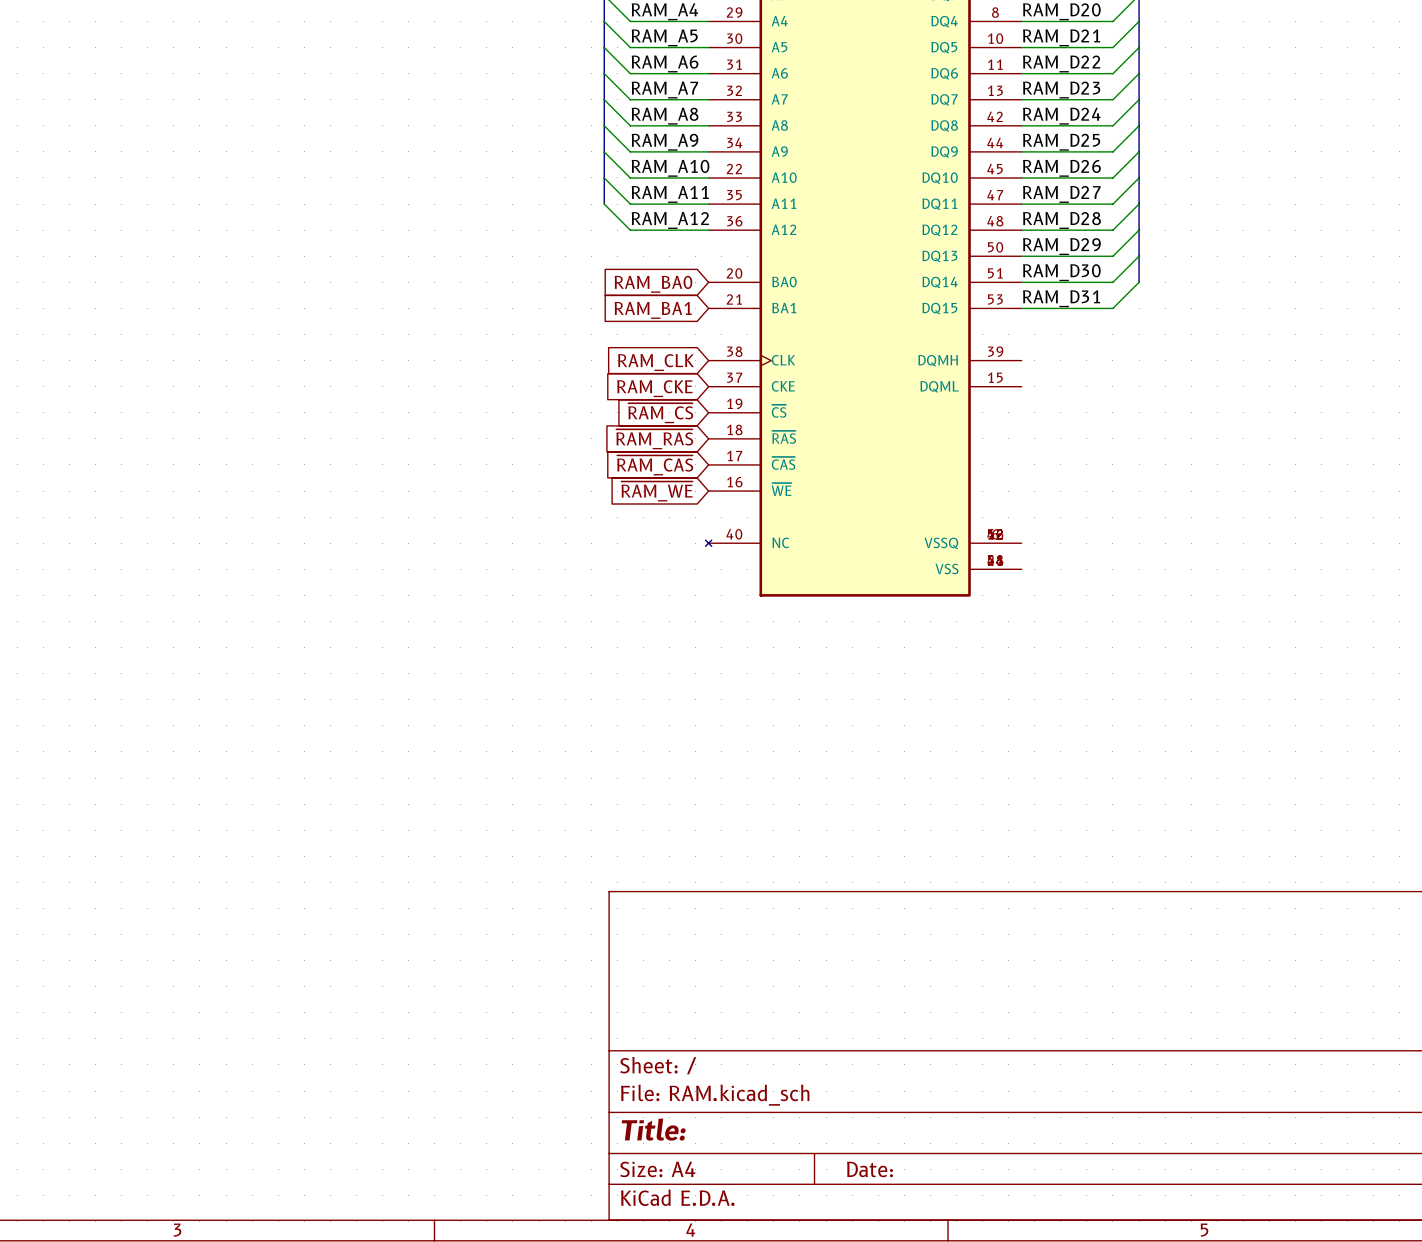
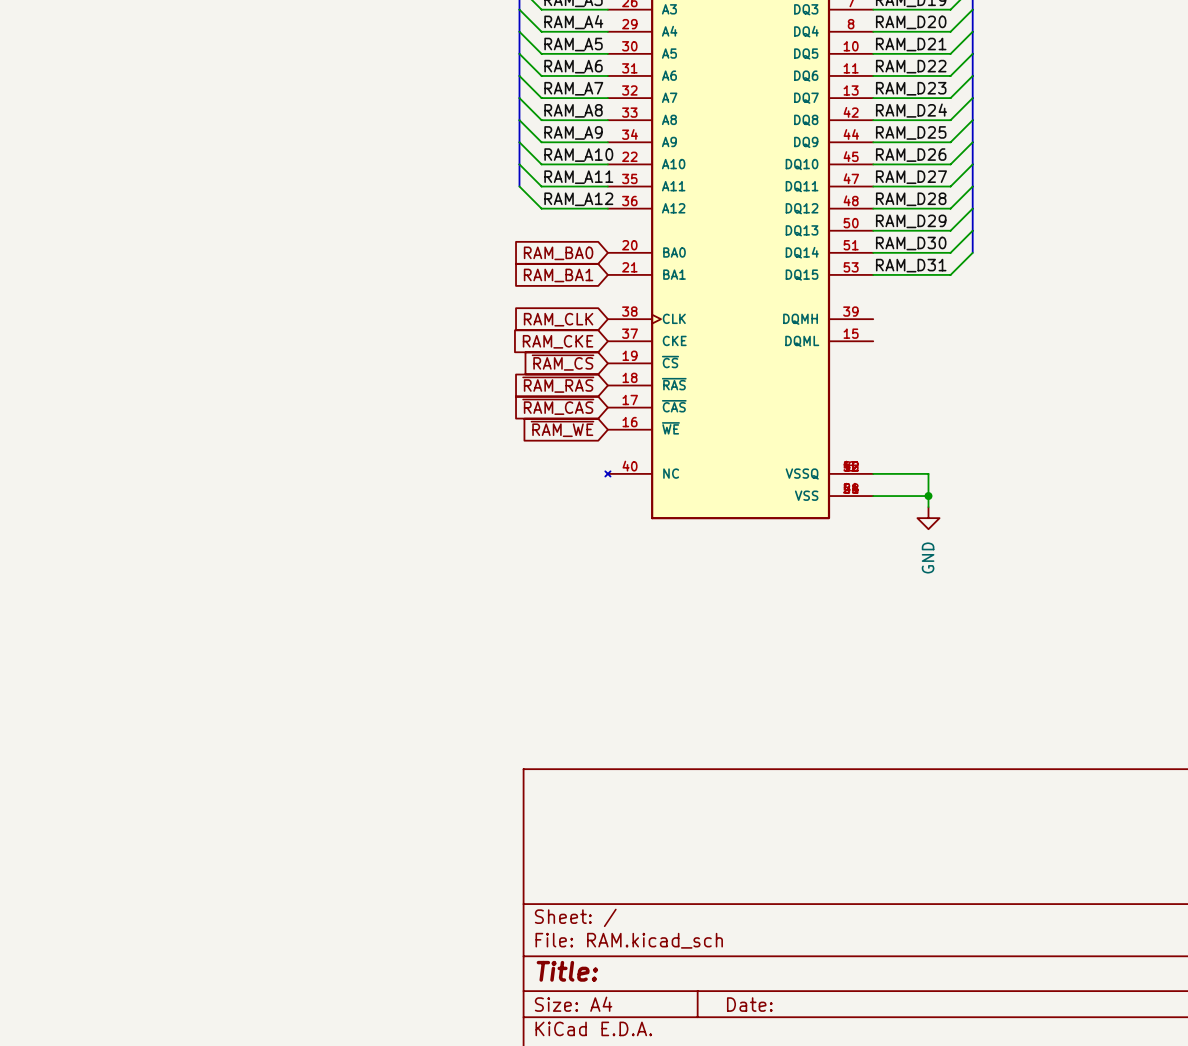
wire: none -> (873, 473) (928, 473) (928, 507)
wire: none -> (873, 496) (928, 496)
junction: none -> (928, 496)
power symbol: none -> GND (928, 518)

